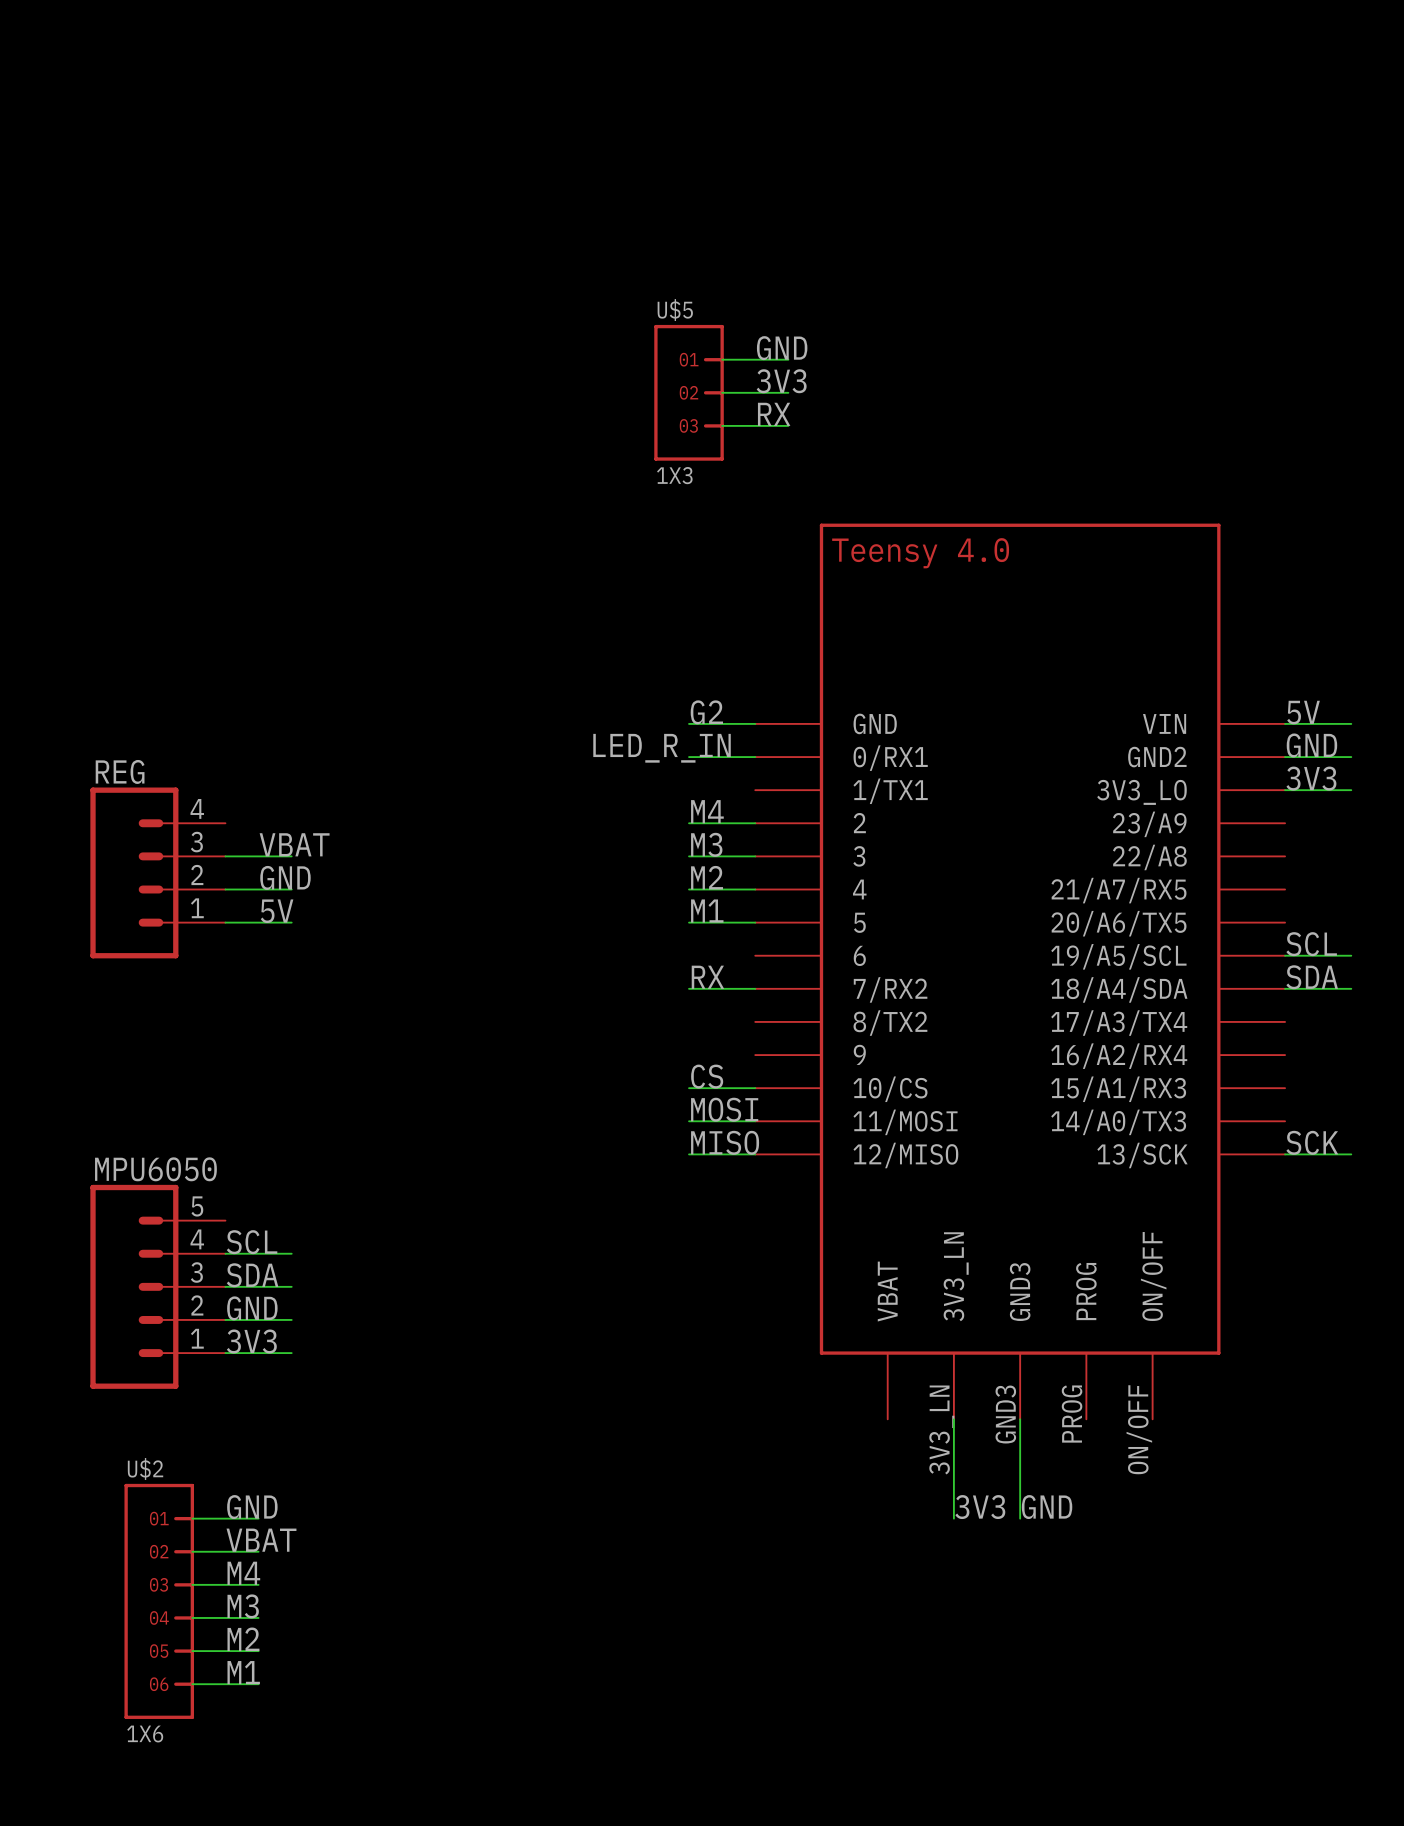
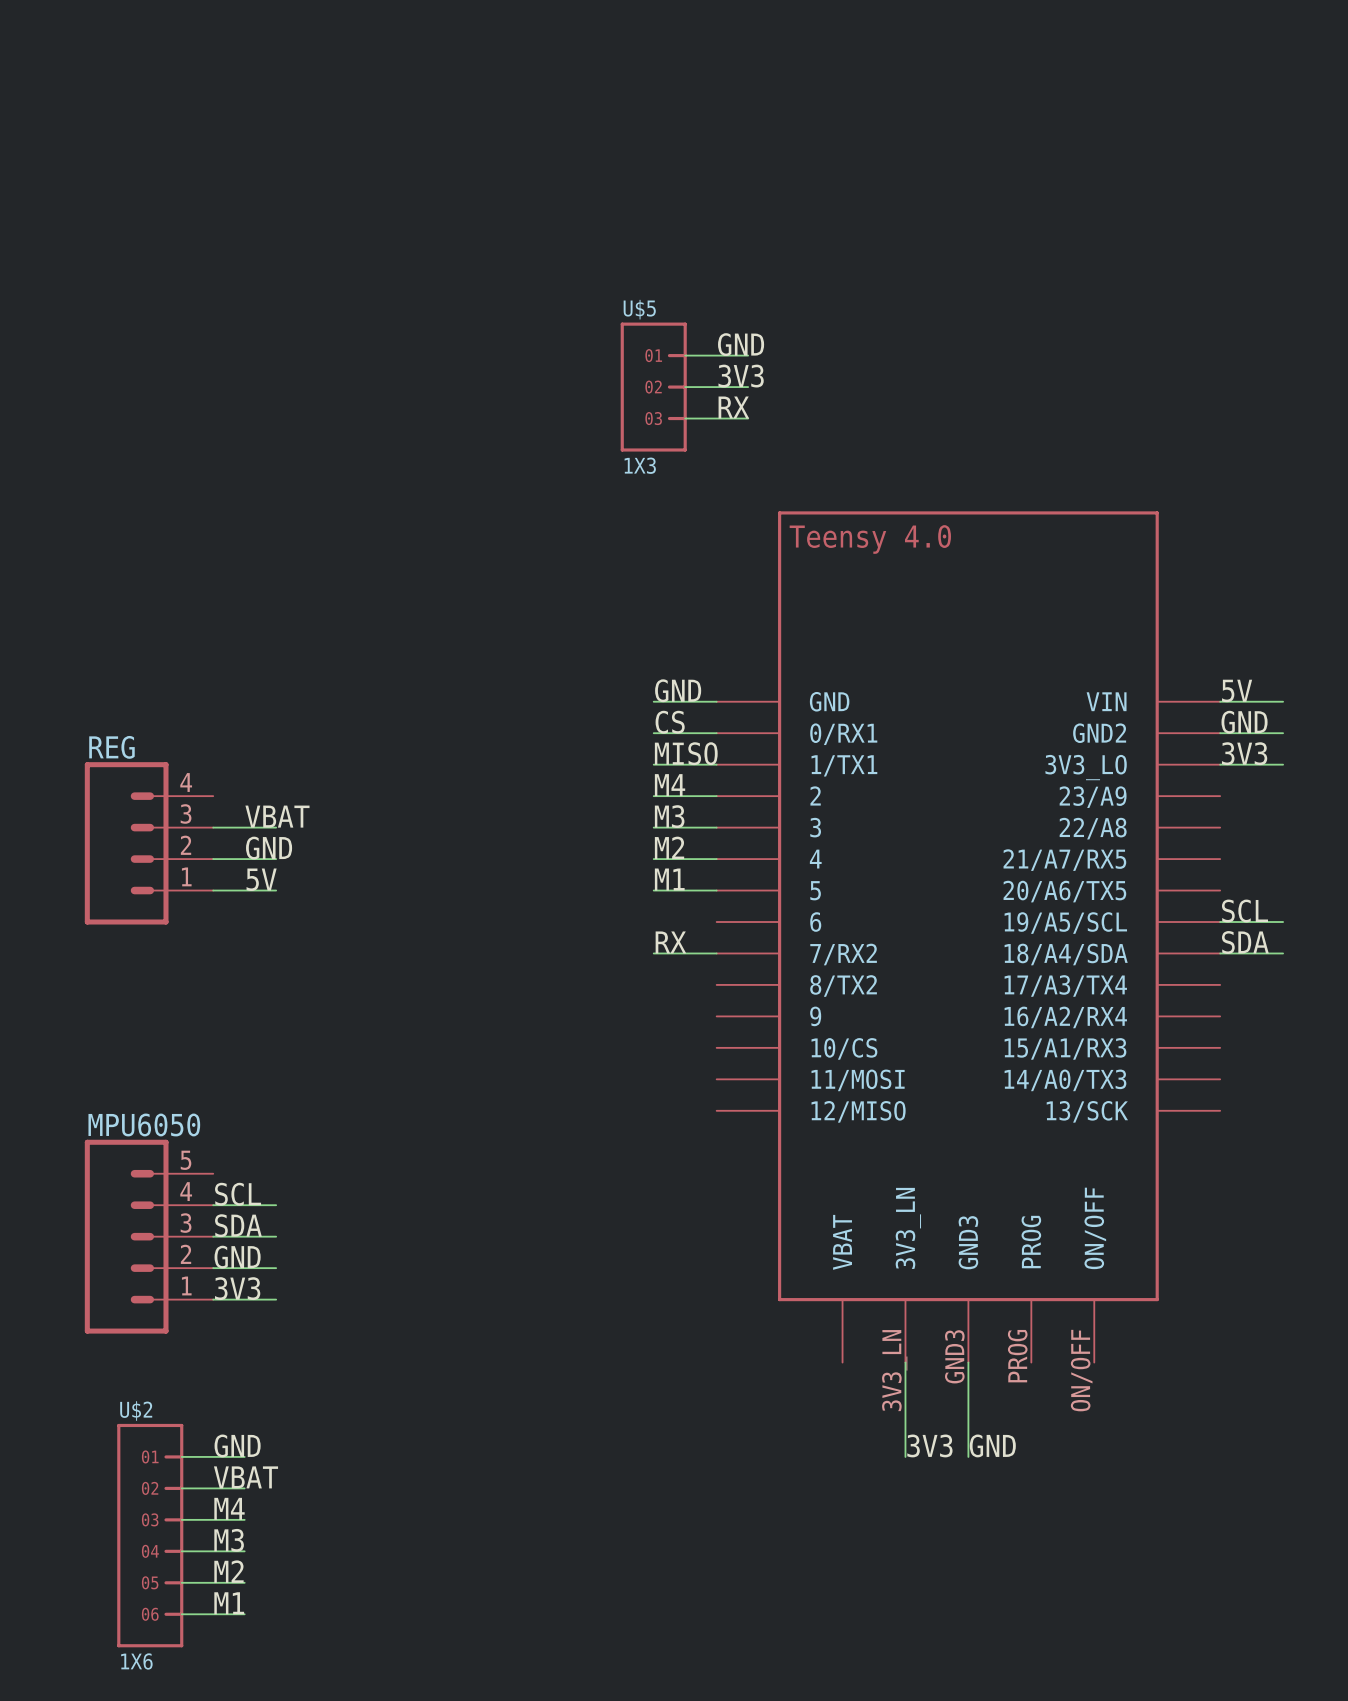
label: G2 (706, 712) -> GND (678, 690)
label: none -> CS (670, 722)
label: LED_R_IN (662, 748) -> none
label: none -> MISO (686, 753)
label: CS (707, 1076) -> none
wire: (689, 1088) (755, 1088) -> (653, 764) (716, 764)
label: MOSI (724, 1109) -> none
wire: (689, 1121) (755, 1121) -> none
label: MISO (725, 1142) -> none
label: SCK (1312, 1142) -> none
wire: (689, 1154) (755, 1154) -> none
wire: (1285, 1154) (1351, 1154) -> none

